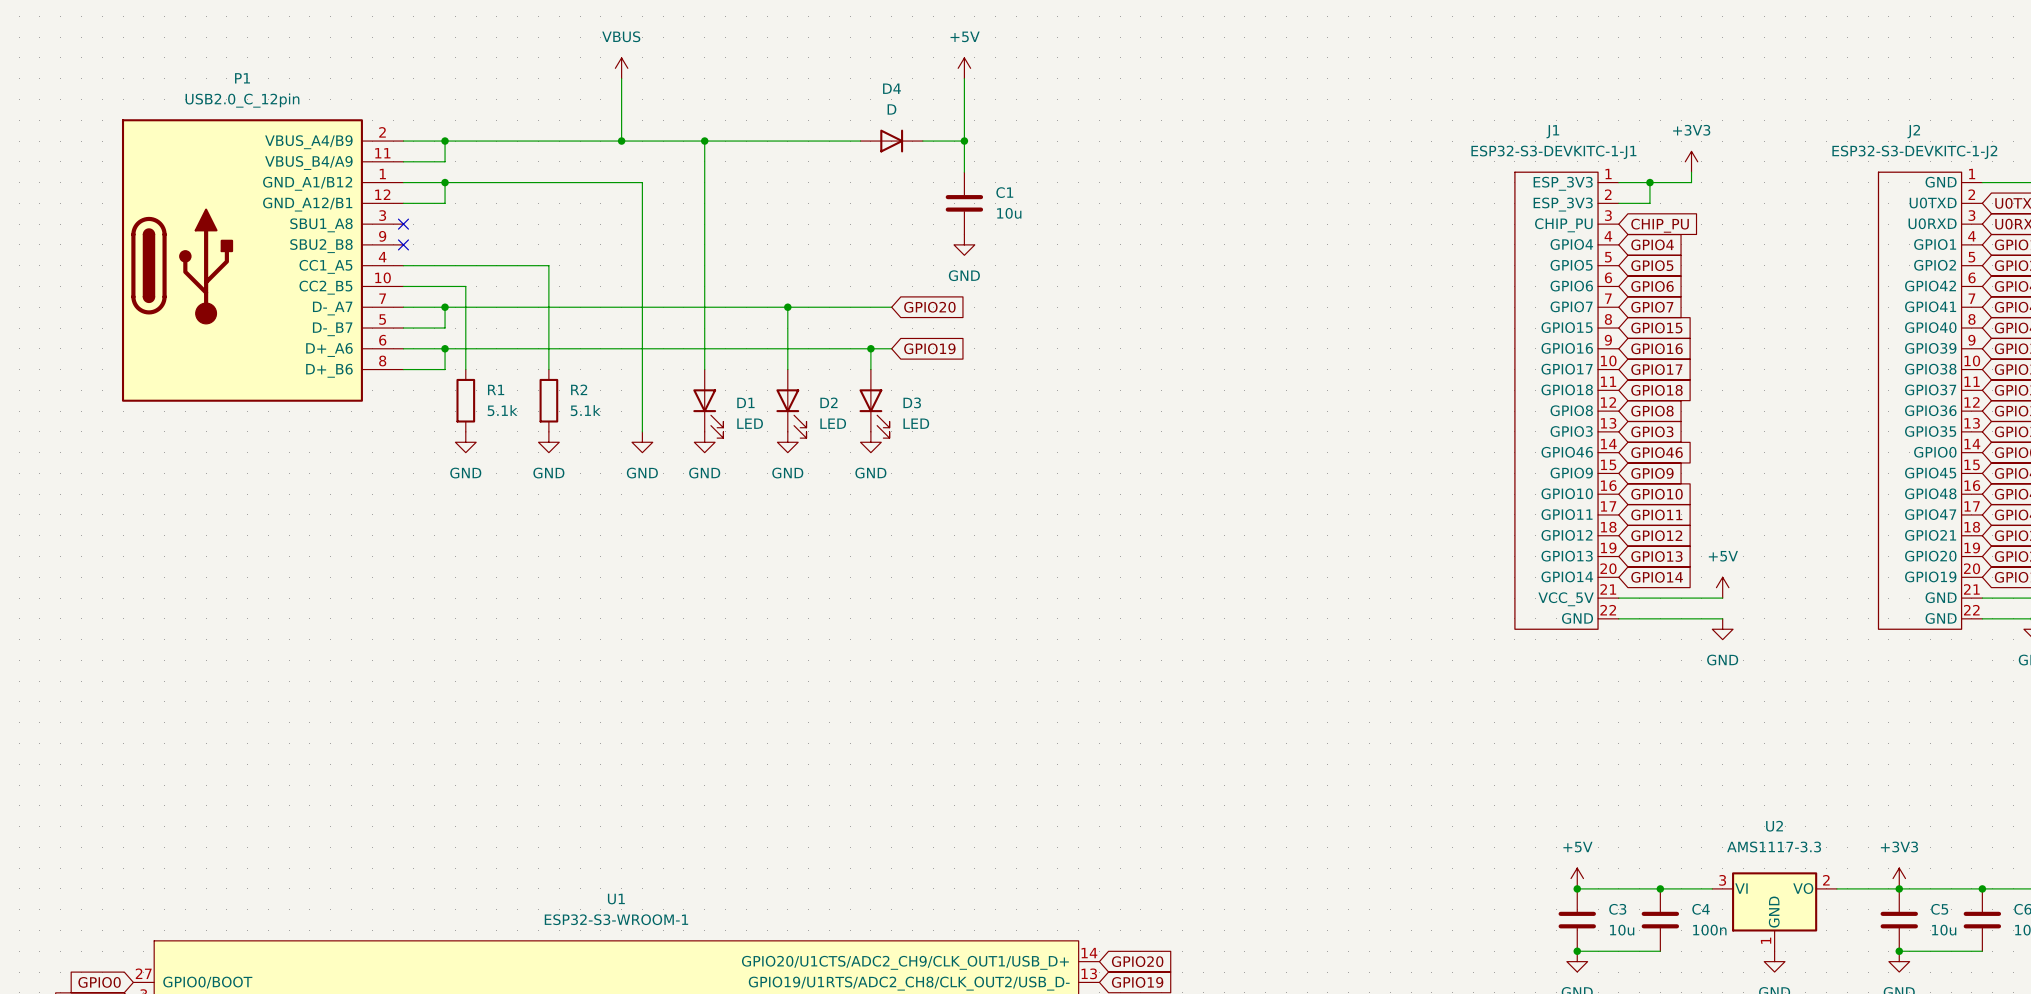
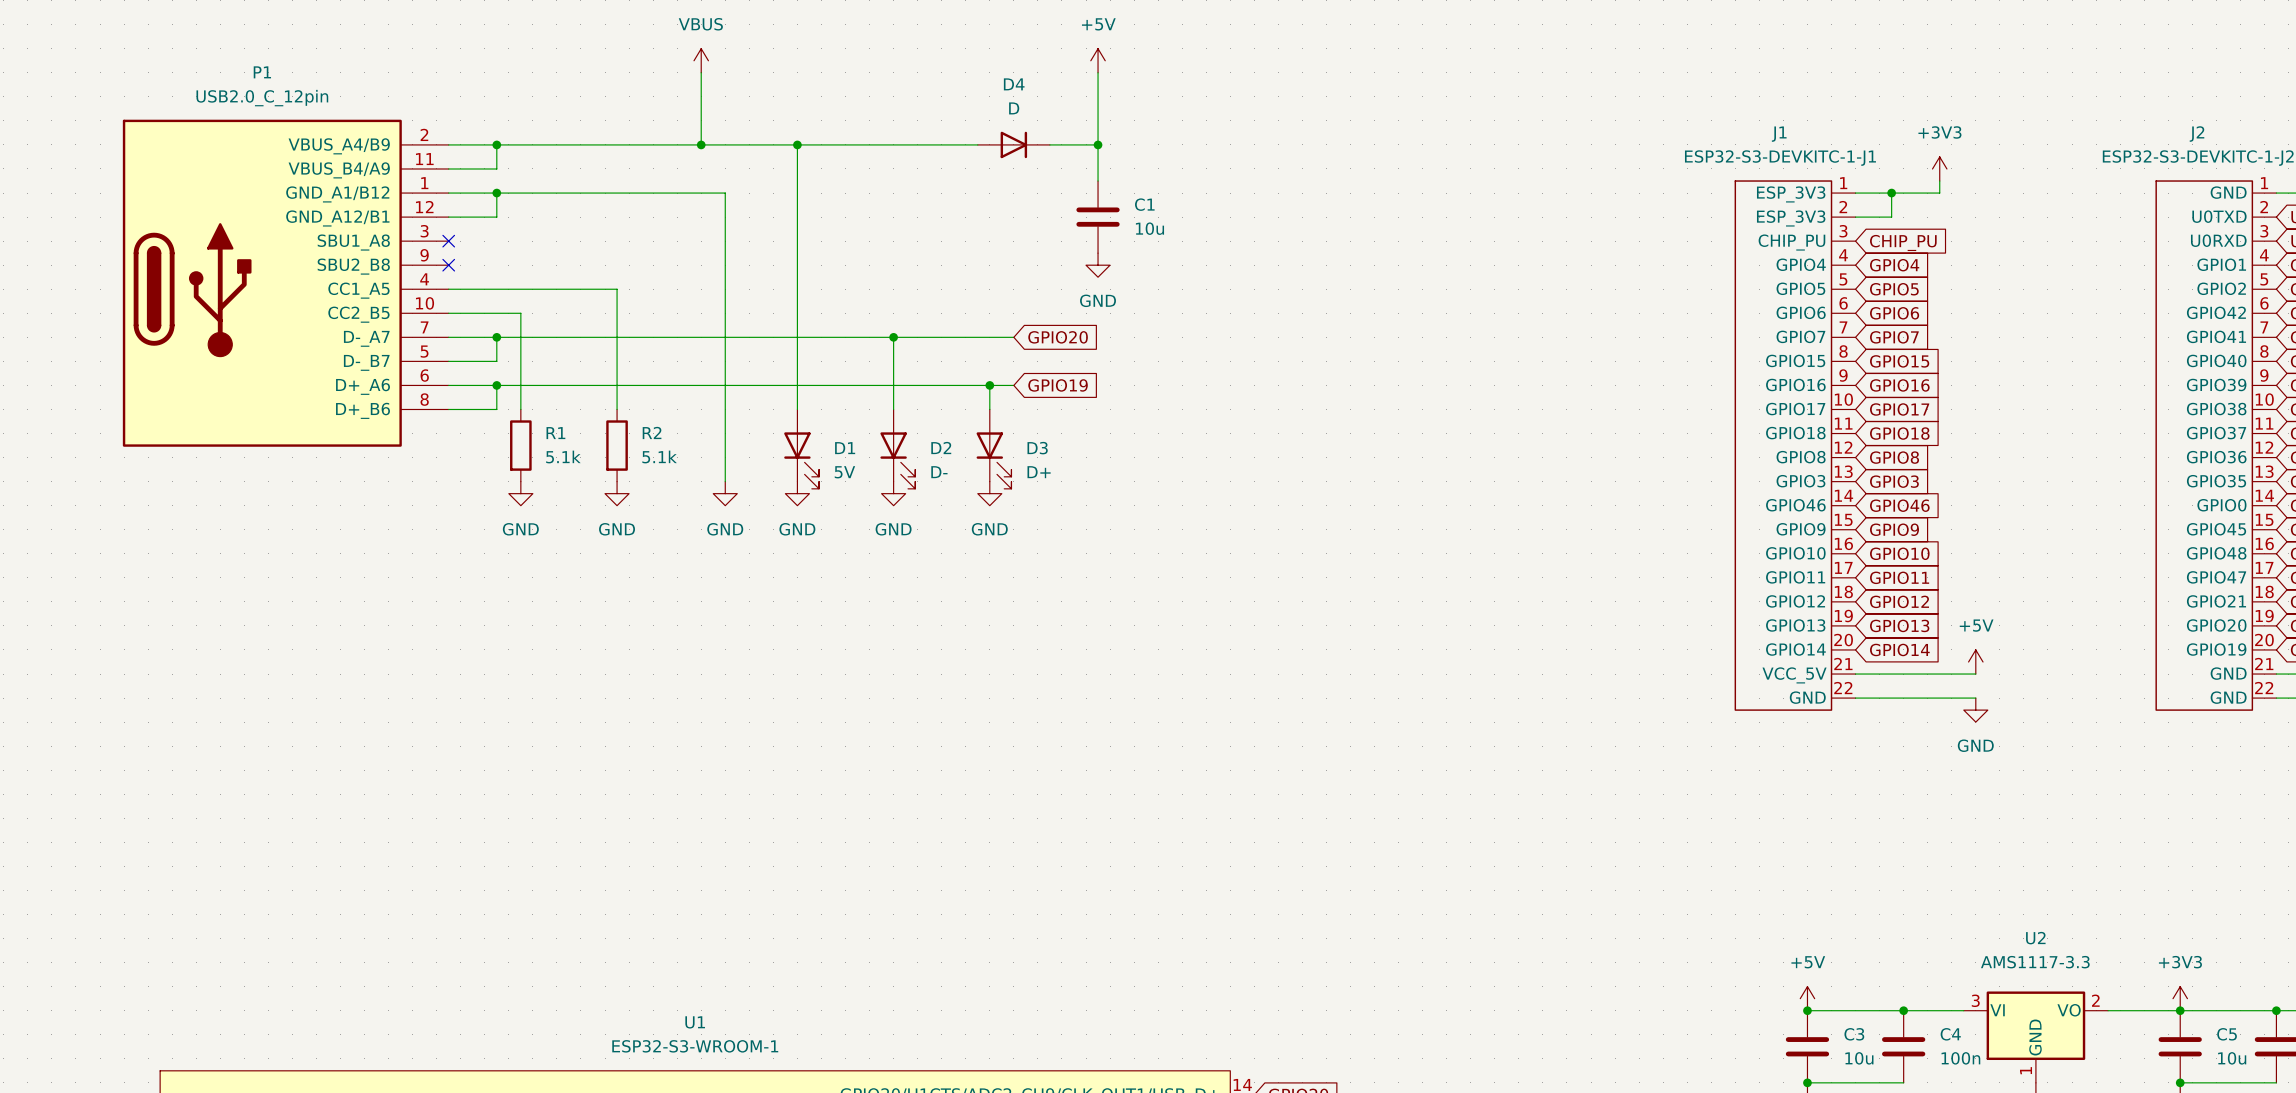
D1 value: LED (750, 423) -> 5V (844, 472)
D2 value: LED (833, 423) -> D- (939, 472)
D3 value: LED (916, 423) -> D+ (1039, 472)

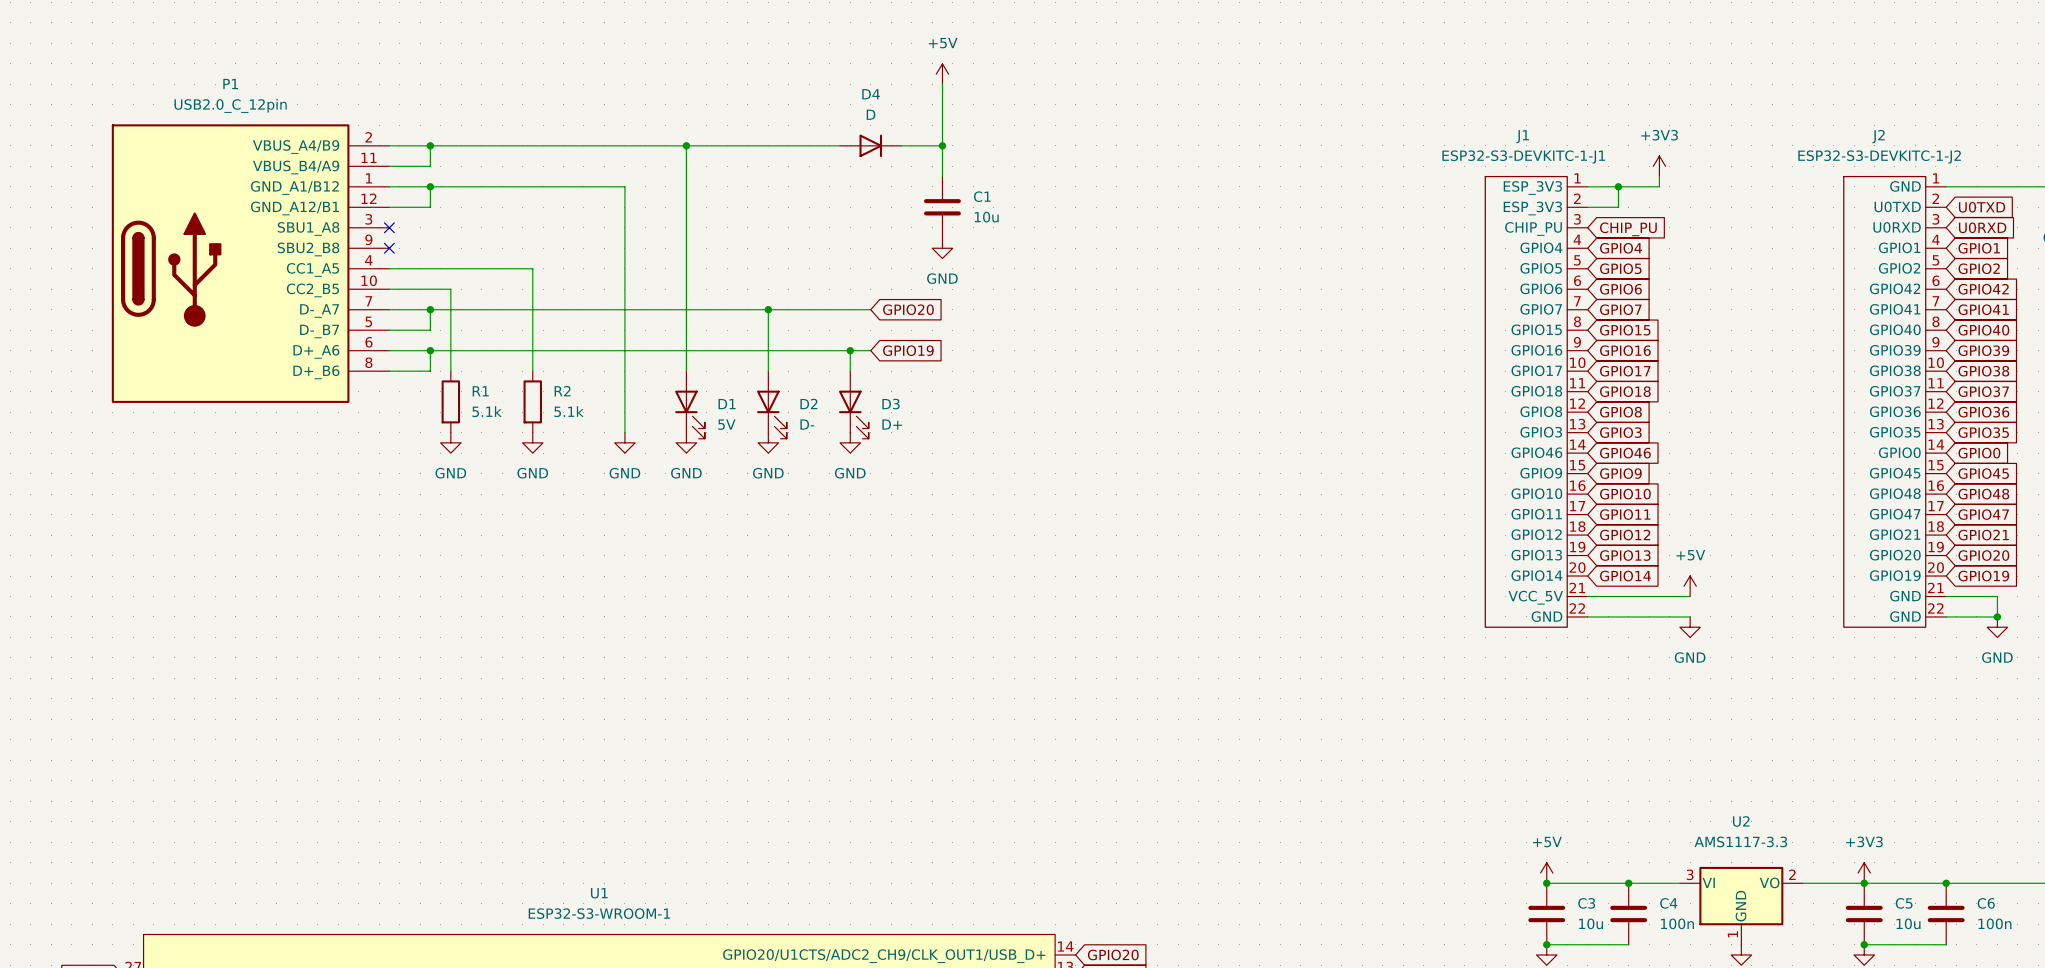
power symbol: VBUS (701, 60) -> none
wire: (701, 72) (701, 144) -> none
junction: (701, 144) -> none

